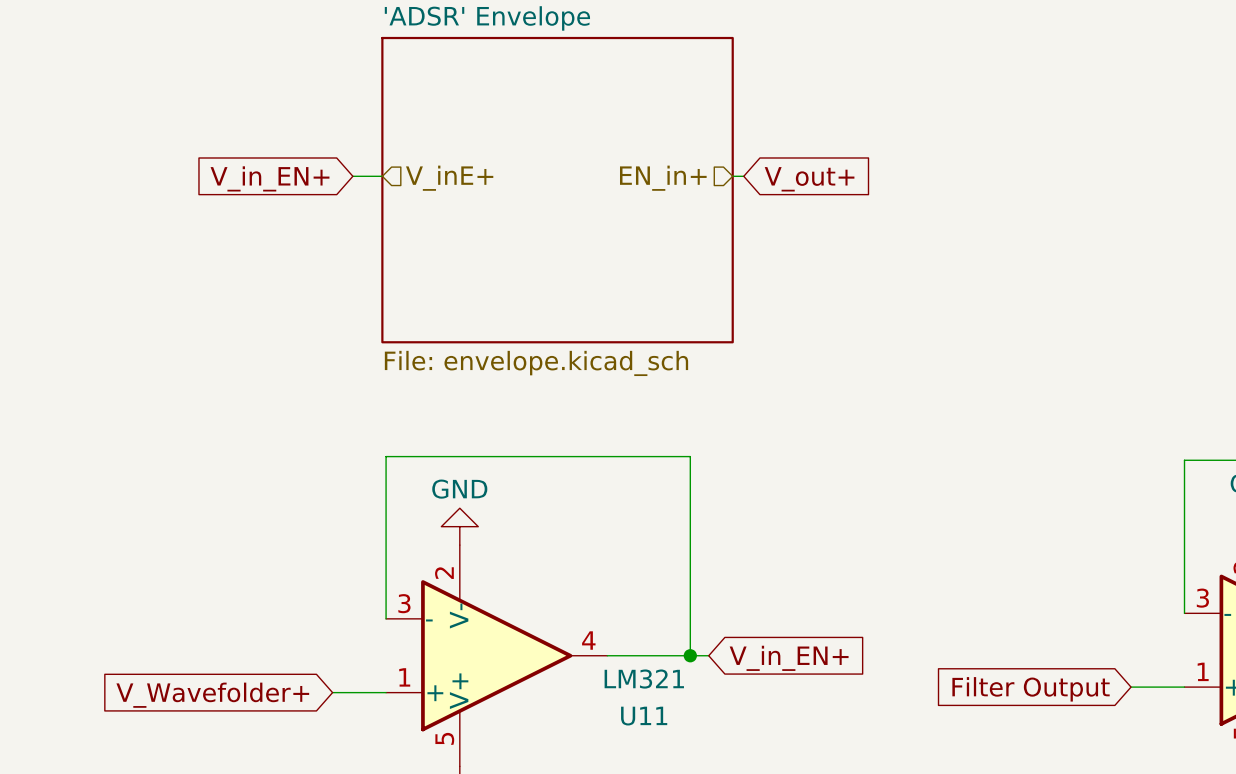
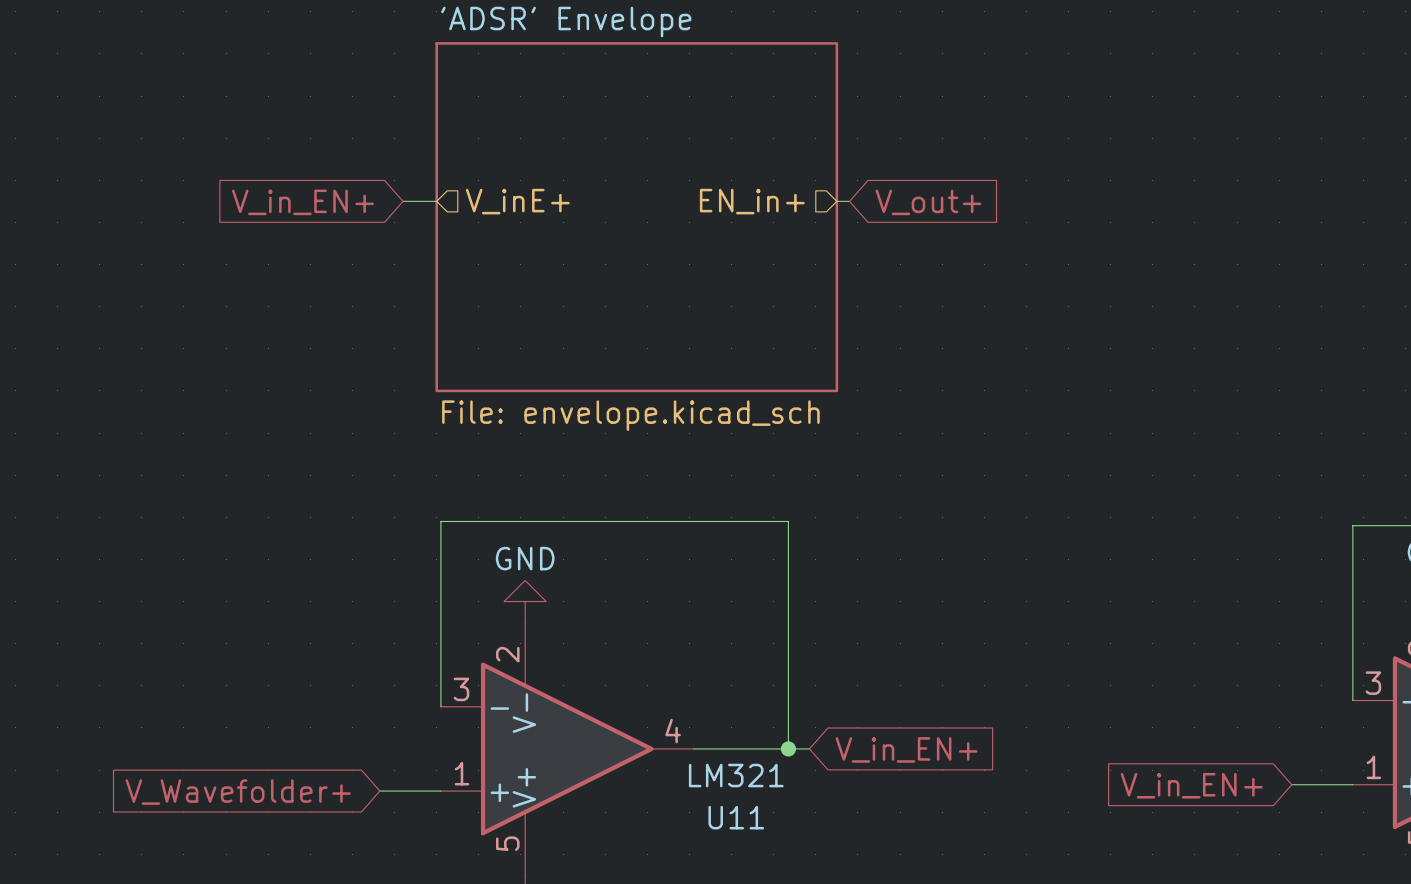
global label: Filter Output (1031, 689) -> V_in_EN+ (1191, 785)

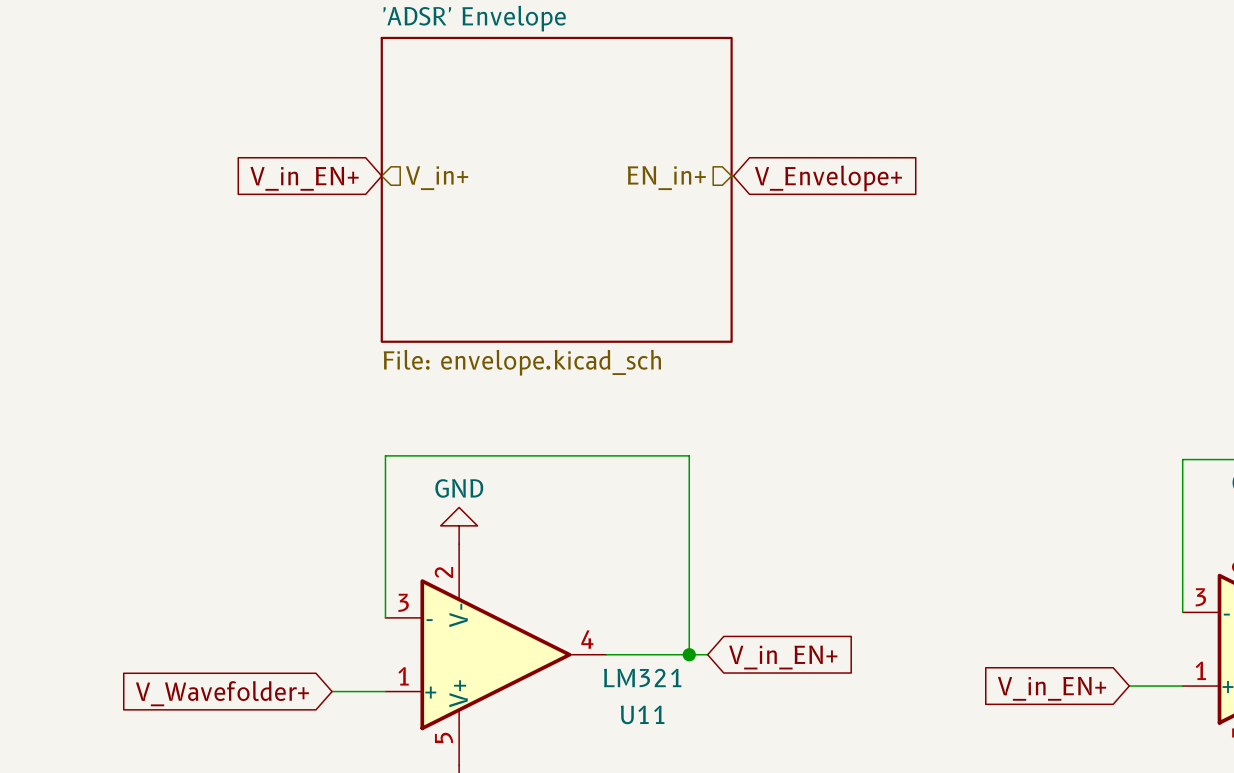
wire: (403, 201) (436, 201) -> none
hierarchical label: V_inE+ (517, 201) -> V_in+ (437, 178)
wire: (838, 201) (849, 201) -> none
global label position: V_in_EN+ (302, 202) -> V_in_EN+ (304, 178)
global label: V_out+ (928, 202) -> V_Envelope+ (828, 178)

